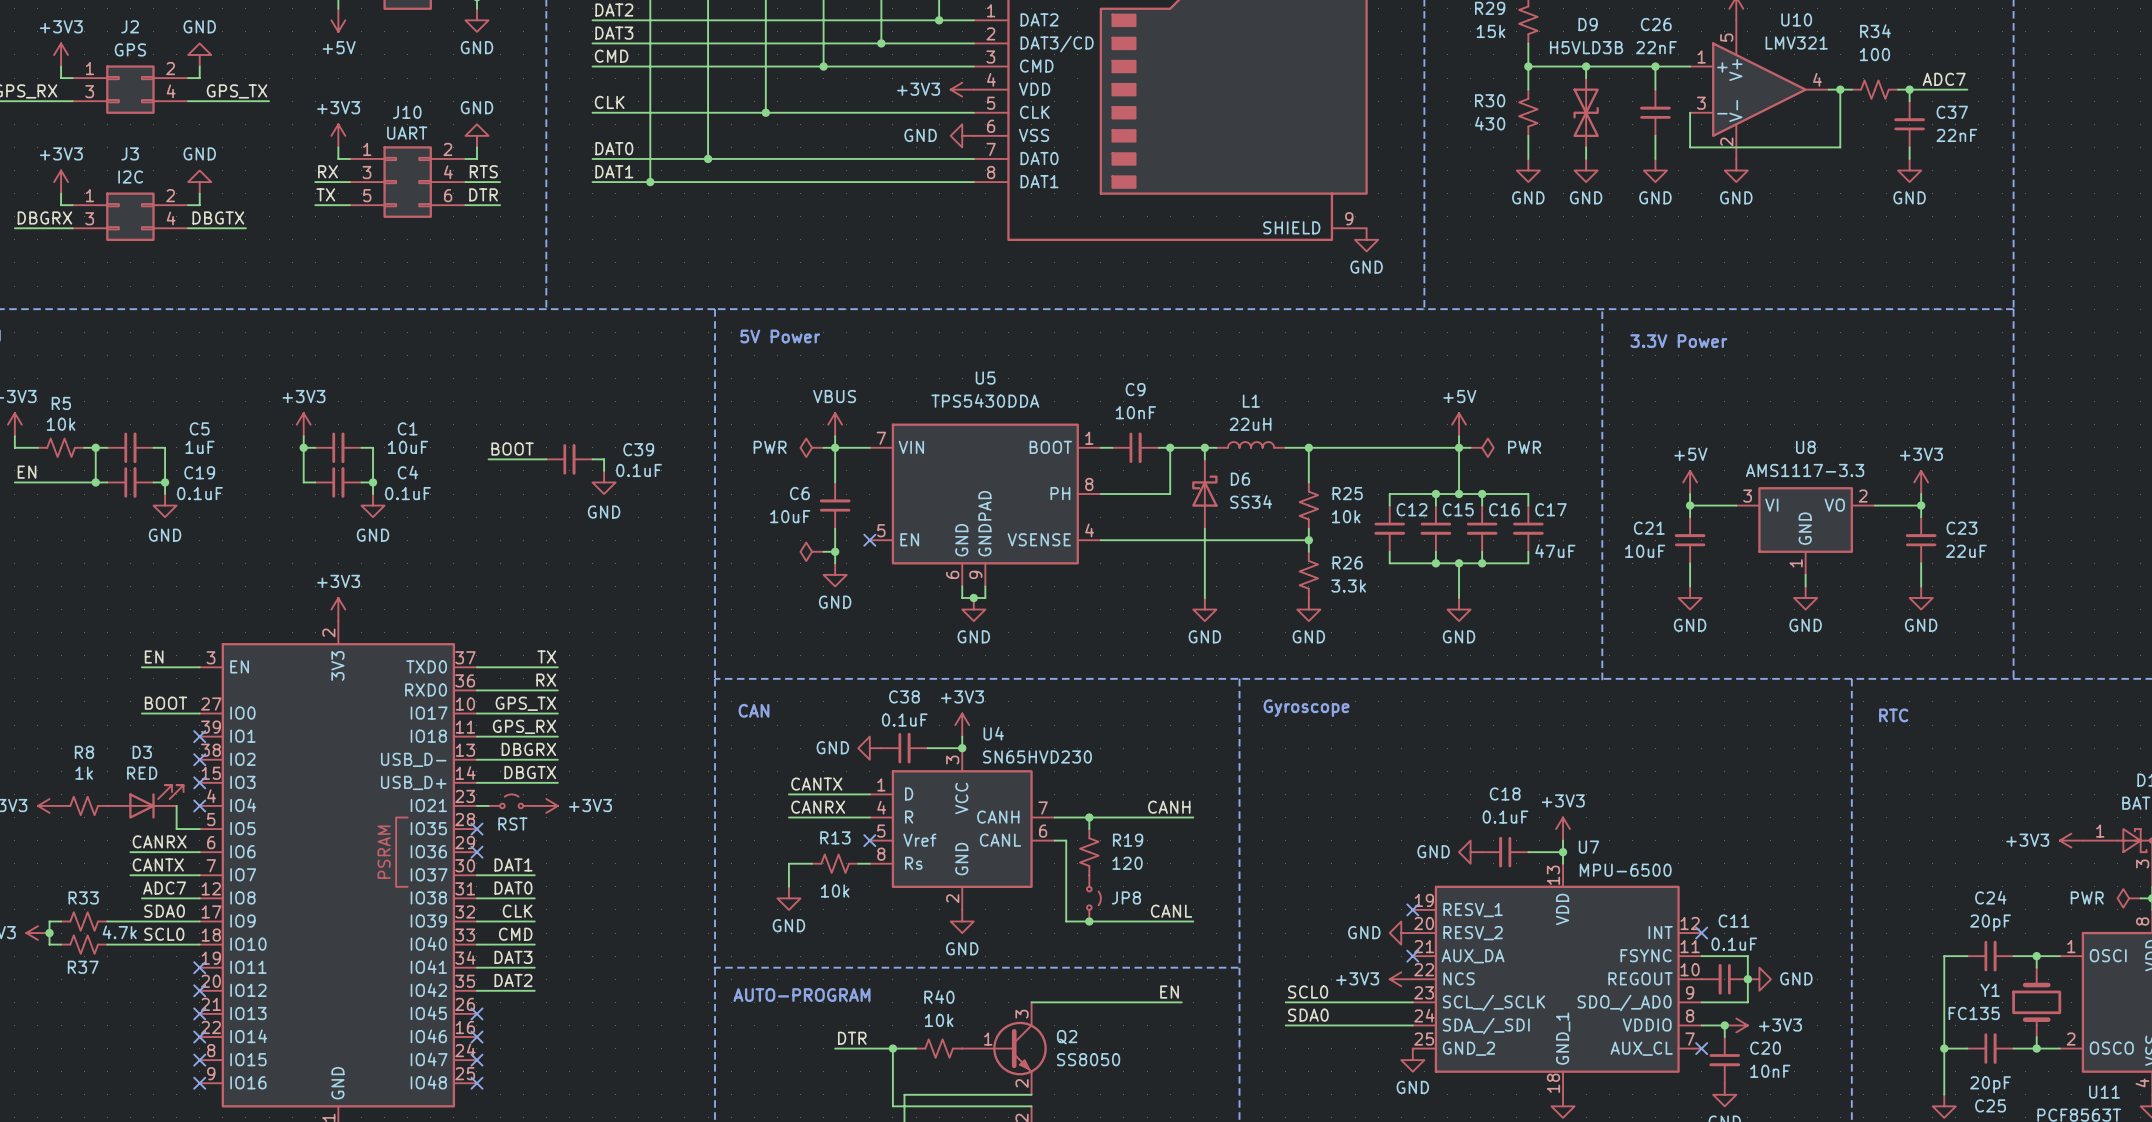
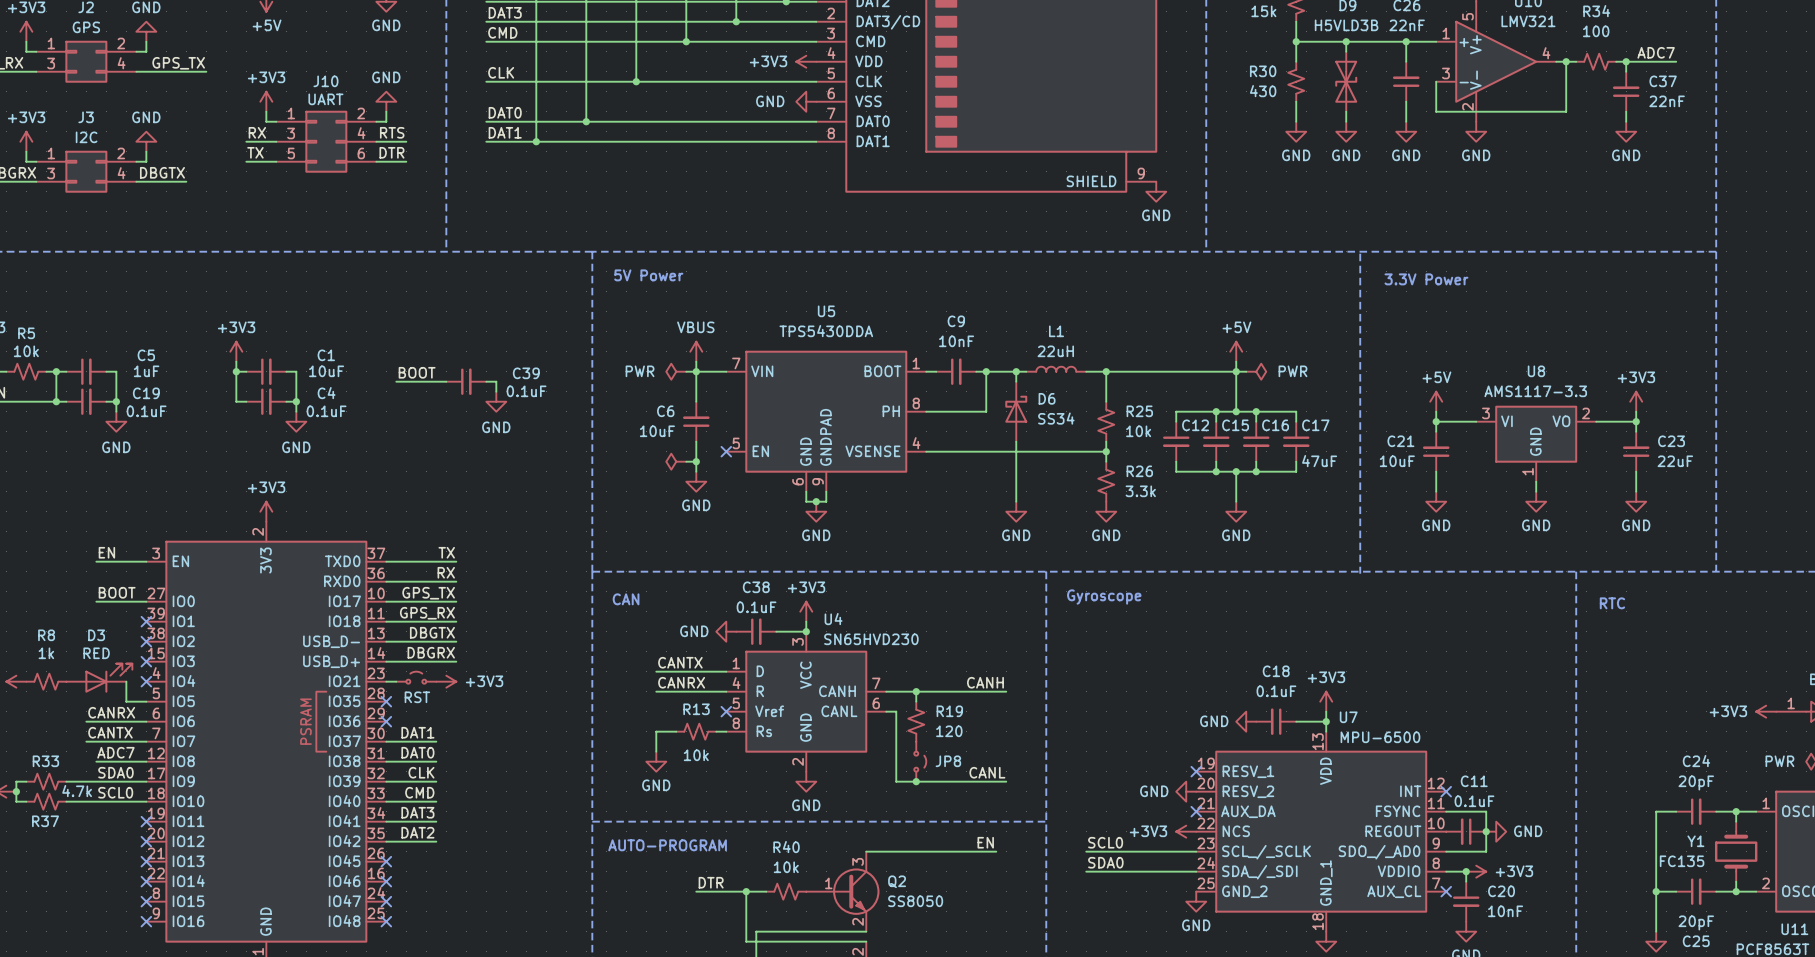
label: DBGRX (528, 749) -> DBGTX (432, 632)
label: DBGTX (530, 772) -> DBGRX (431, 652)

